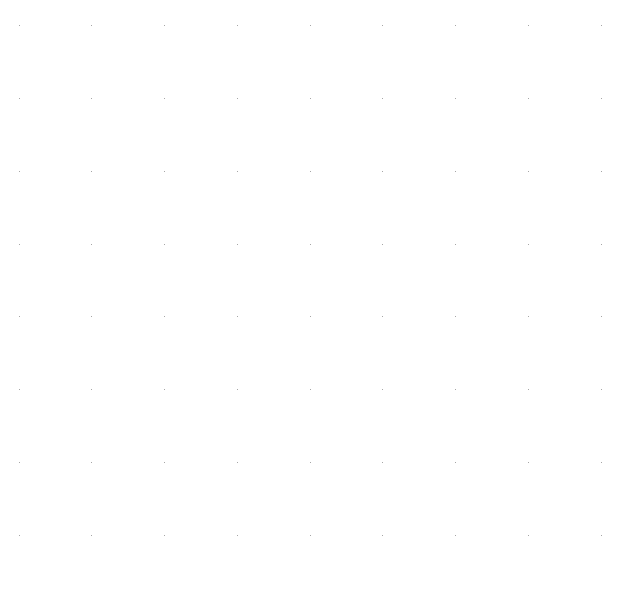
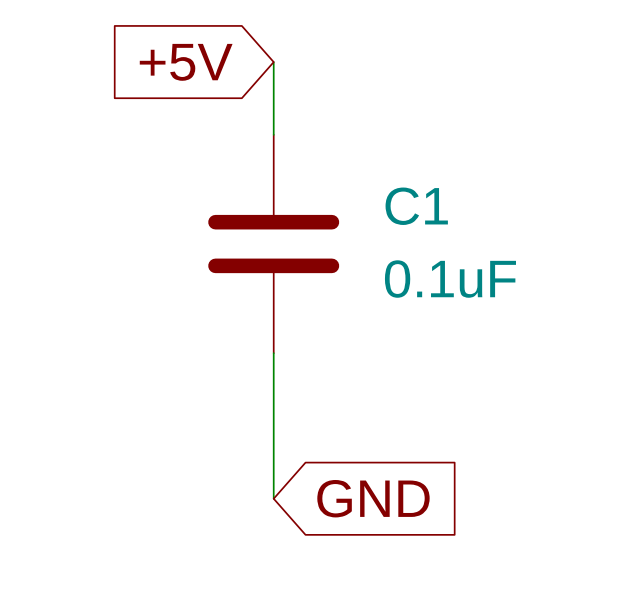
global label: none -> +5V (186, 62)
wire: none -> (273, 62) (273, 134)
C1: none -> 0.1uF (273, 244)
wire: none -> (273, 353) (273, 498)
global label: none -> GND (373, 498)

